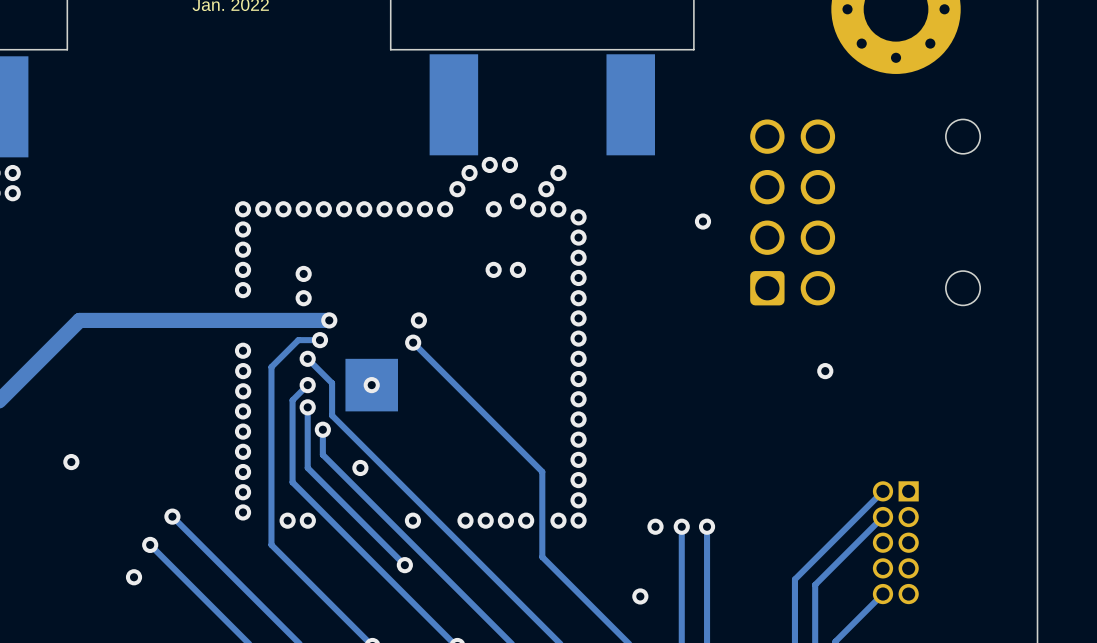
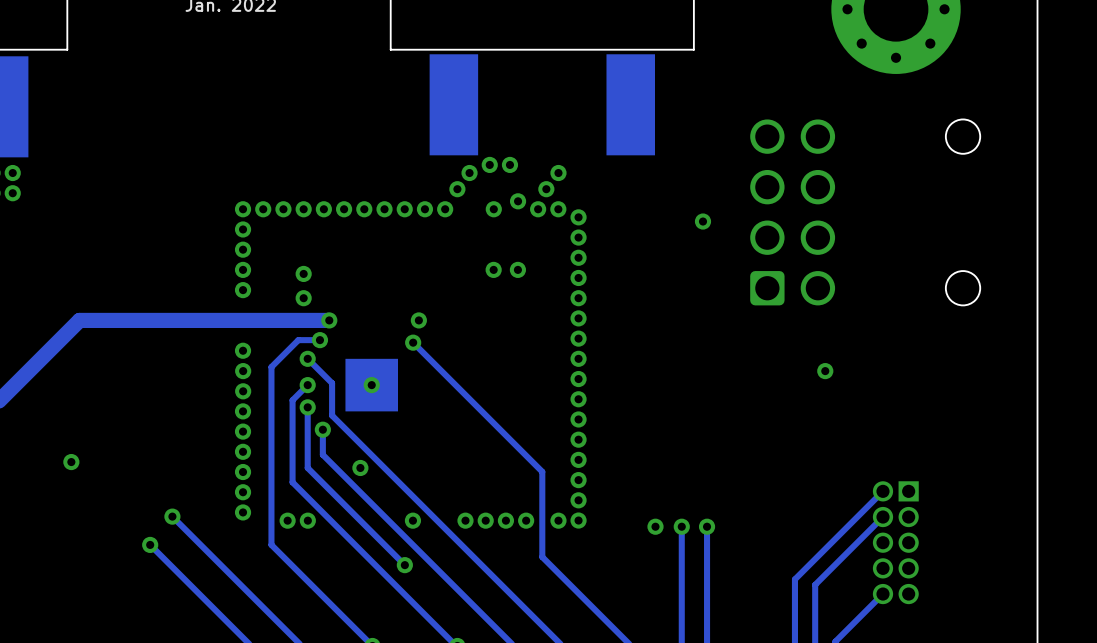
via: (134, 577) -> none
via: (640, 596) -> none

